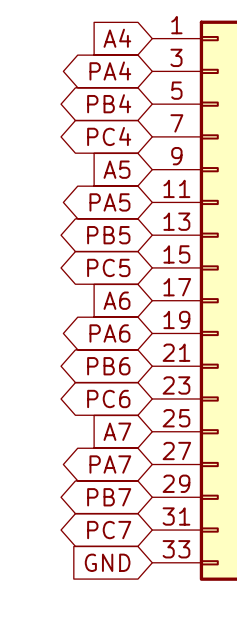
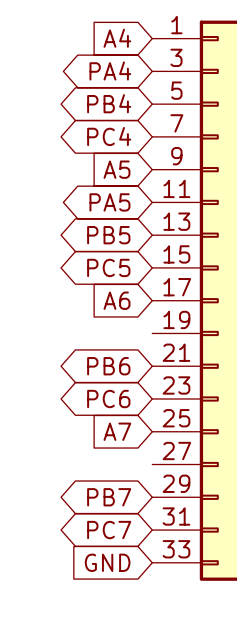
global label: PA6 (109, 333) -> none
global label: PA7 (110, 464) -> none

